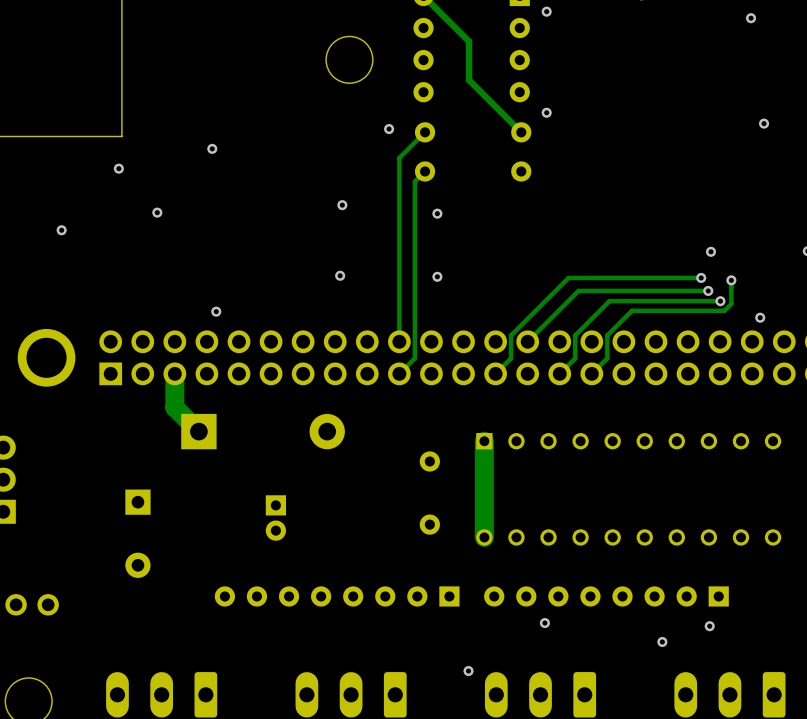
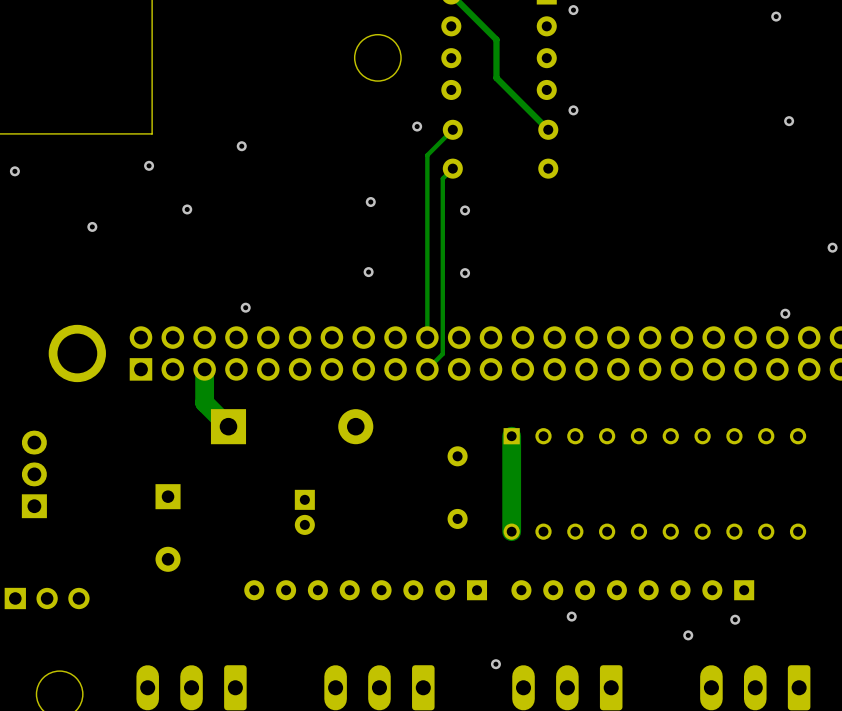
via: (711, 251) -> none
track: (701, 277) (568, 277) (511, 335) (511, 358) (495, 373) -> none
via: (701, 277) -> none
track: (731, 280) (731, 303) (724, 310) (631, 310) (607, 335) (607, 358) (591, 373) -> none
via: (731, 280) -> none
track: (708, 290) (578, 290) (527, 341) -> none
via: (708, 290) -> none
track: (720, 301) (609, 301) (575, 335) (575, 358) (559, 373) -> none
via: (720, 301) -> none

